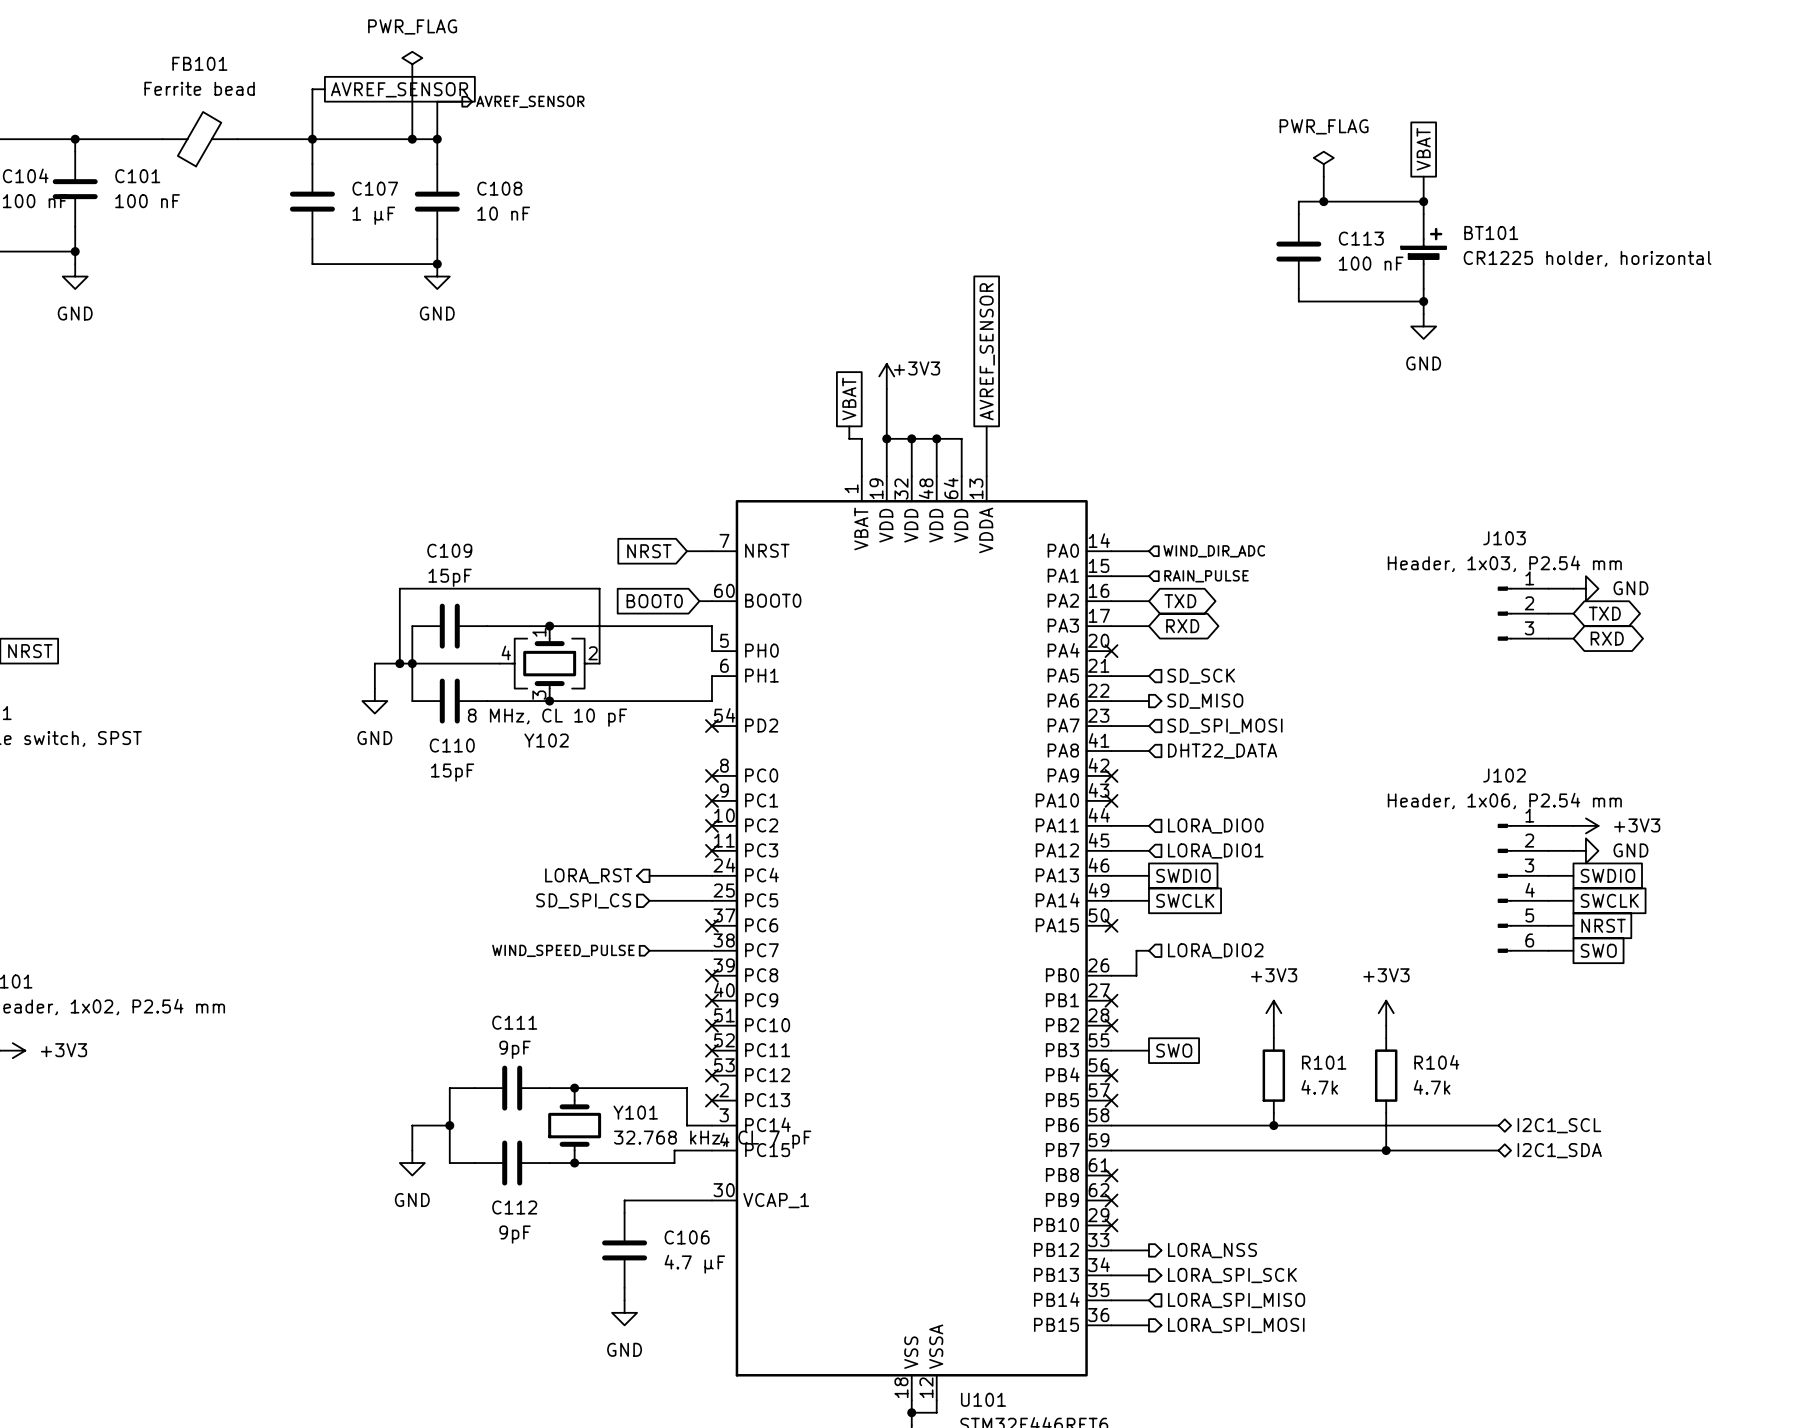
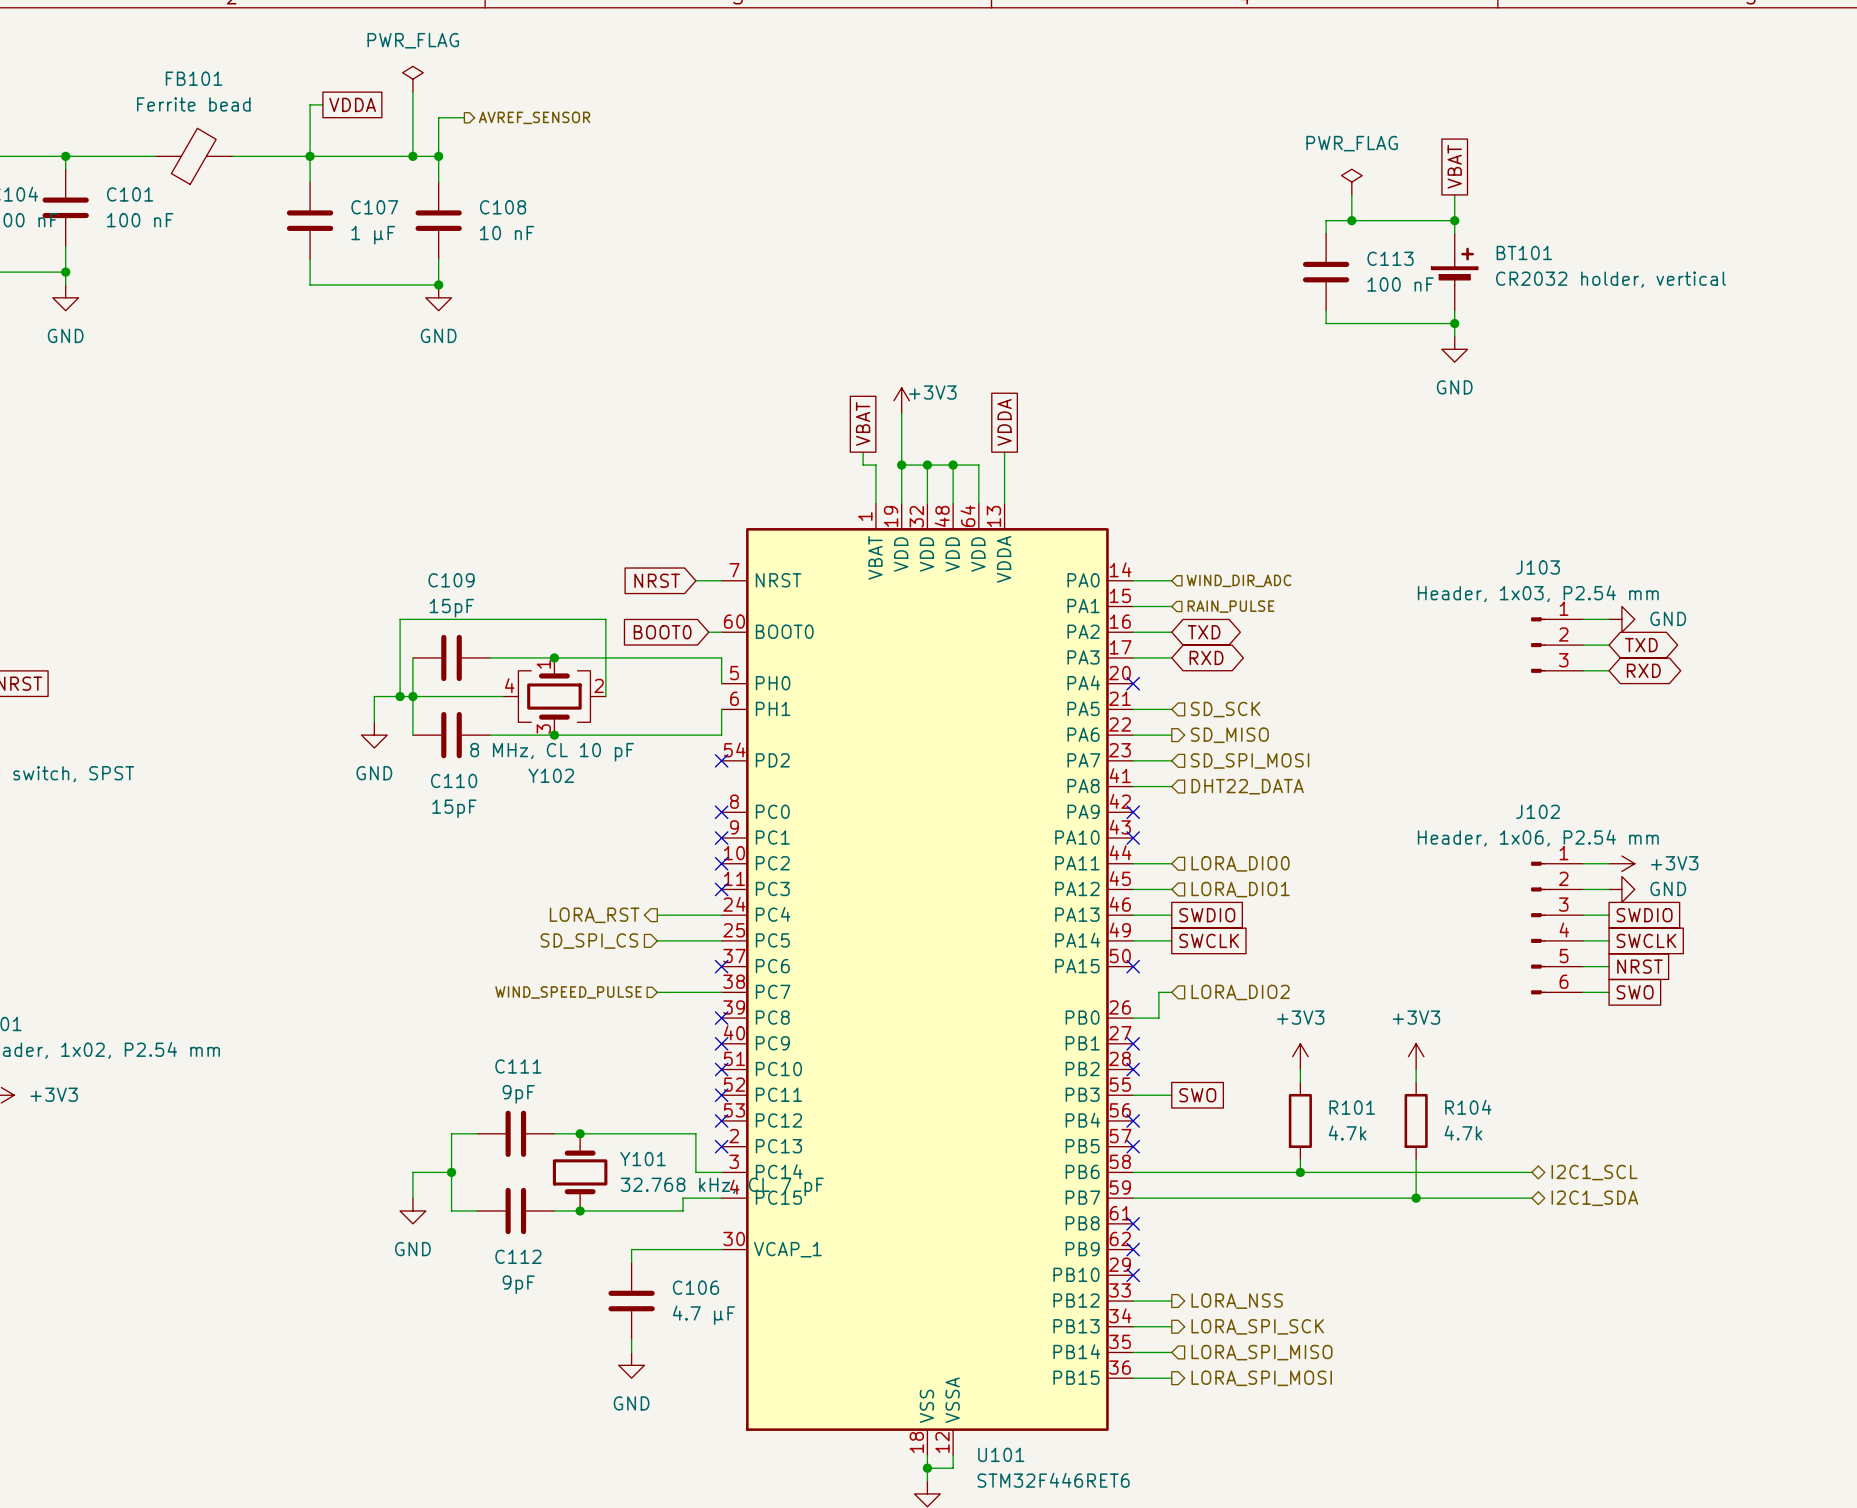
global label: AVREF_SENSOR (399, 89) -> VDDA (352, 104)
BT101 value: CR1225 holder, horizontal (1587, 258) -> CR2032 holder, vertical (1610, 279)
global label: AVREF_SENSOR (987, 351) -> VDDA (1004, 422)

